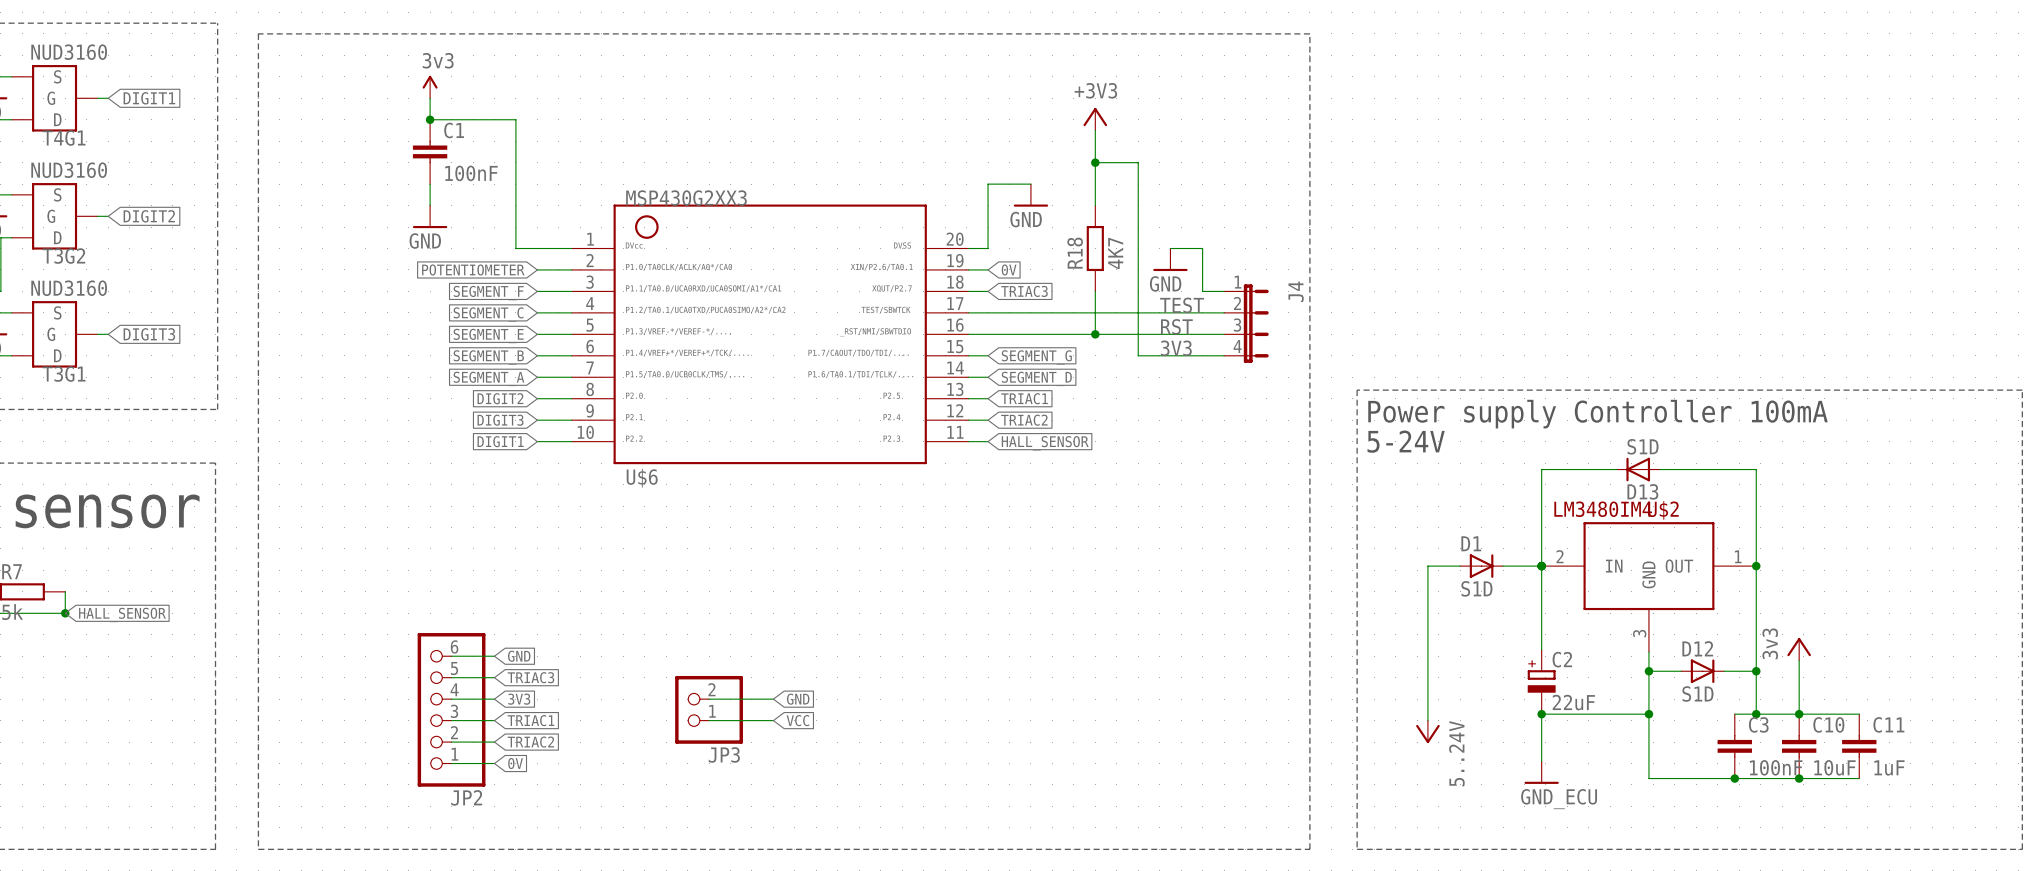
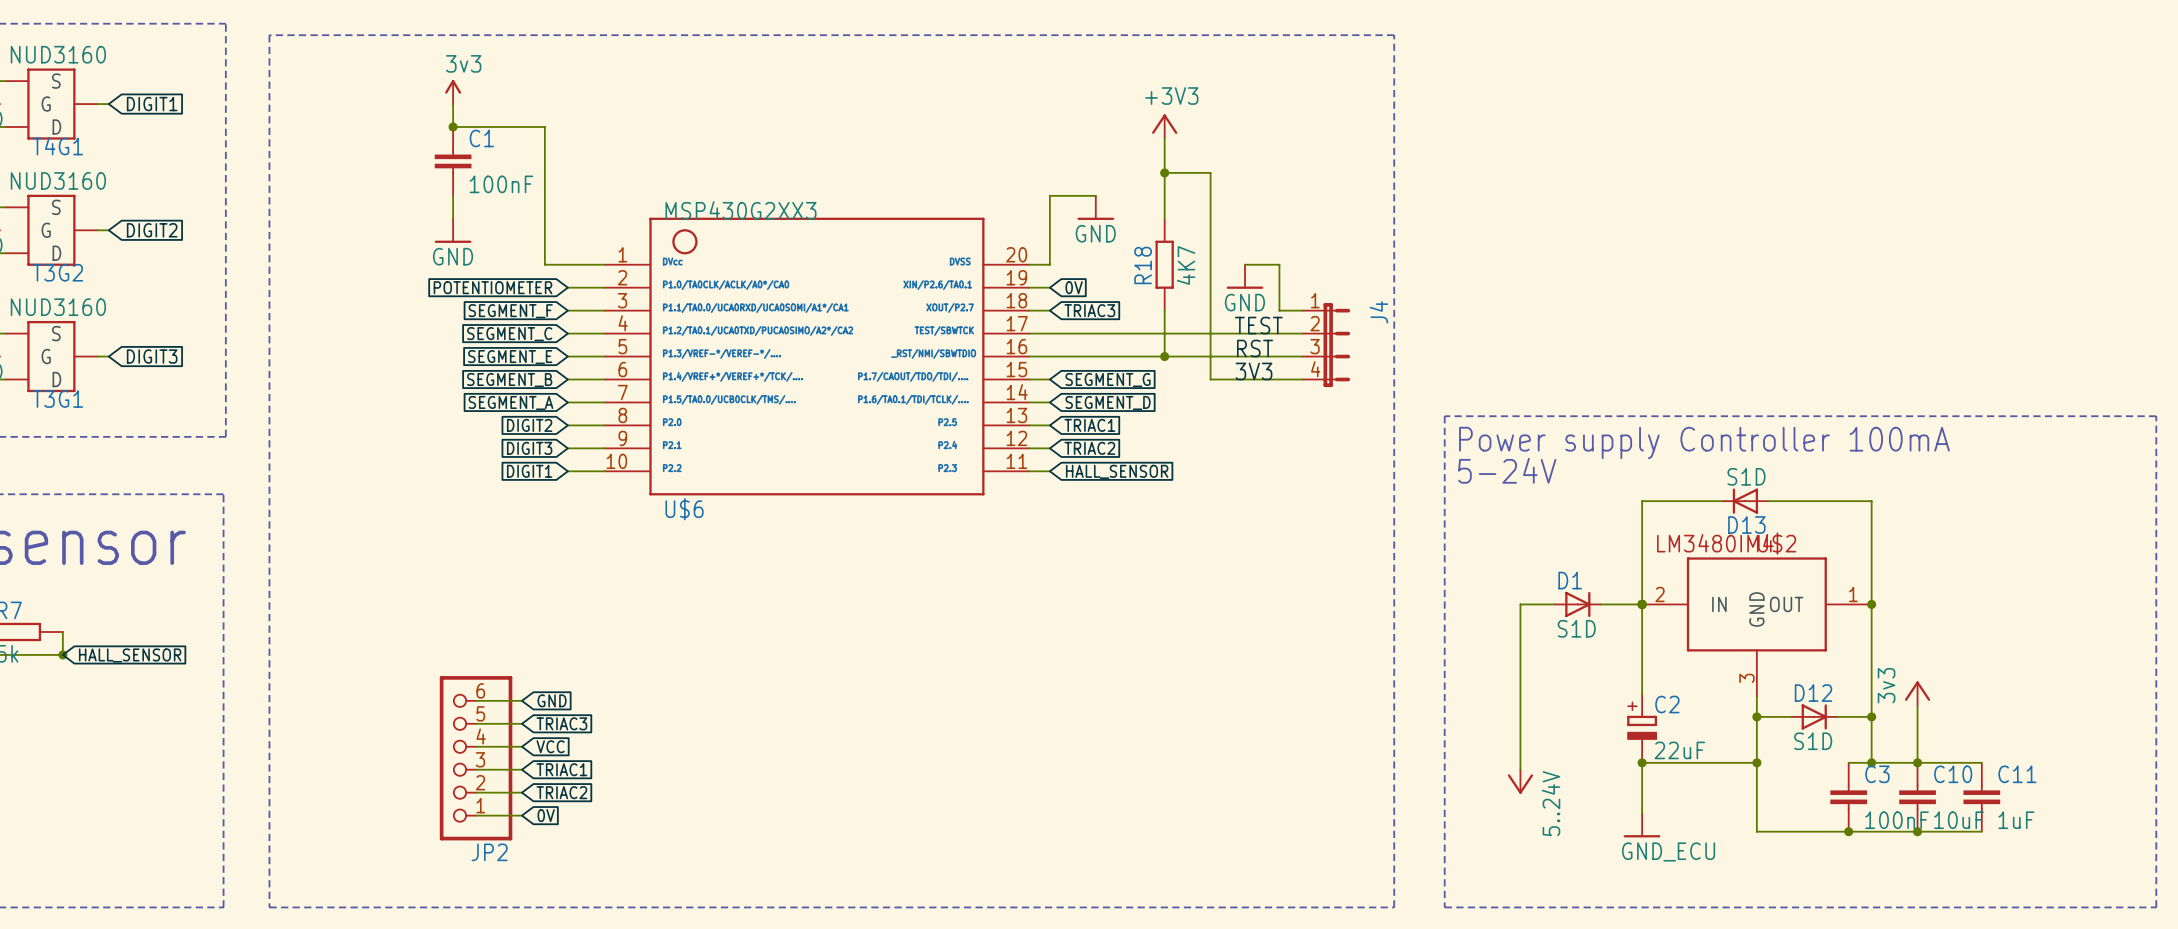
global label: 3V3 (519, 699) -> VCC (550, 746)
wire: (709, 699) (773, 699) -> none
global label: GND (798, 699) -> none
JP3: (709, 709) -> none
wire: (709, 720) (773, 720) -> none
global label: VCC (797, 720) -> none

